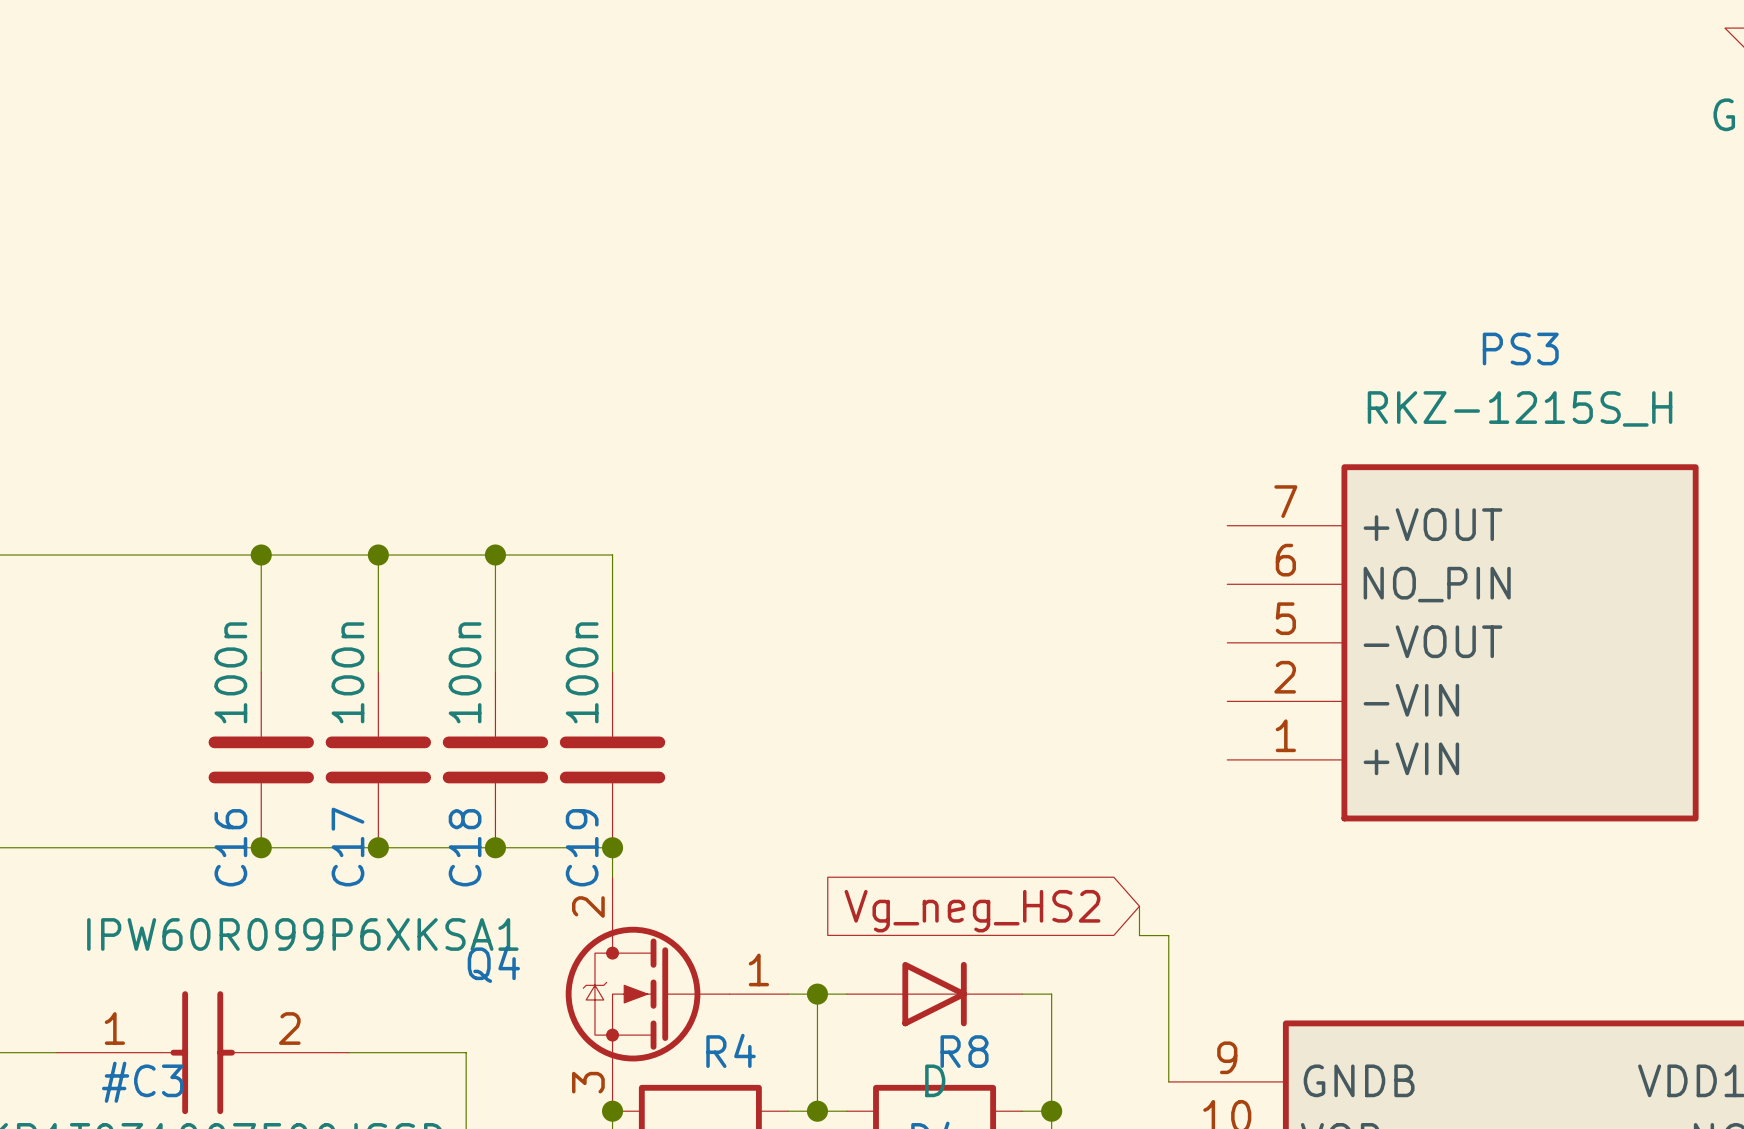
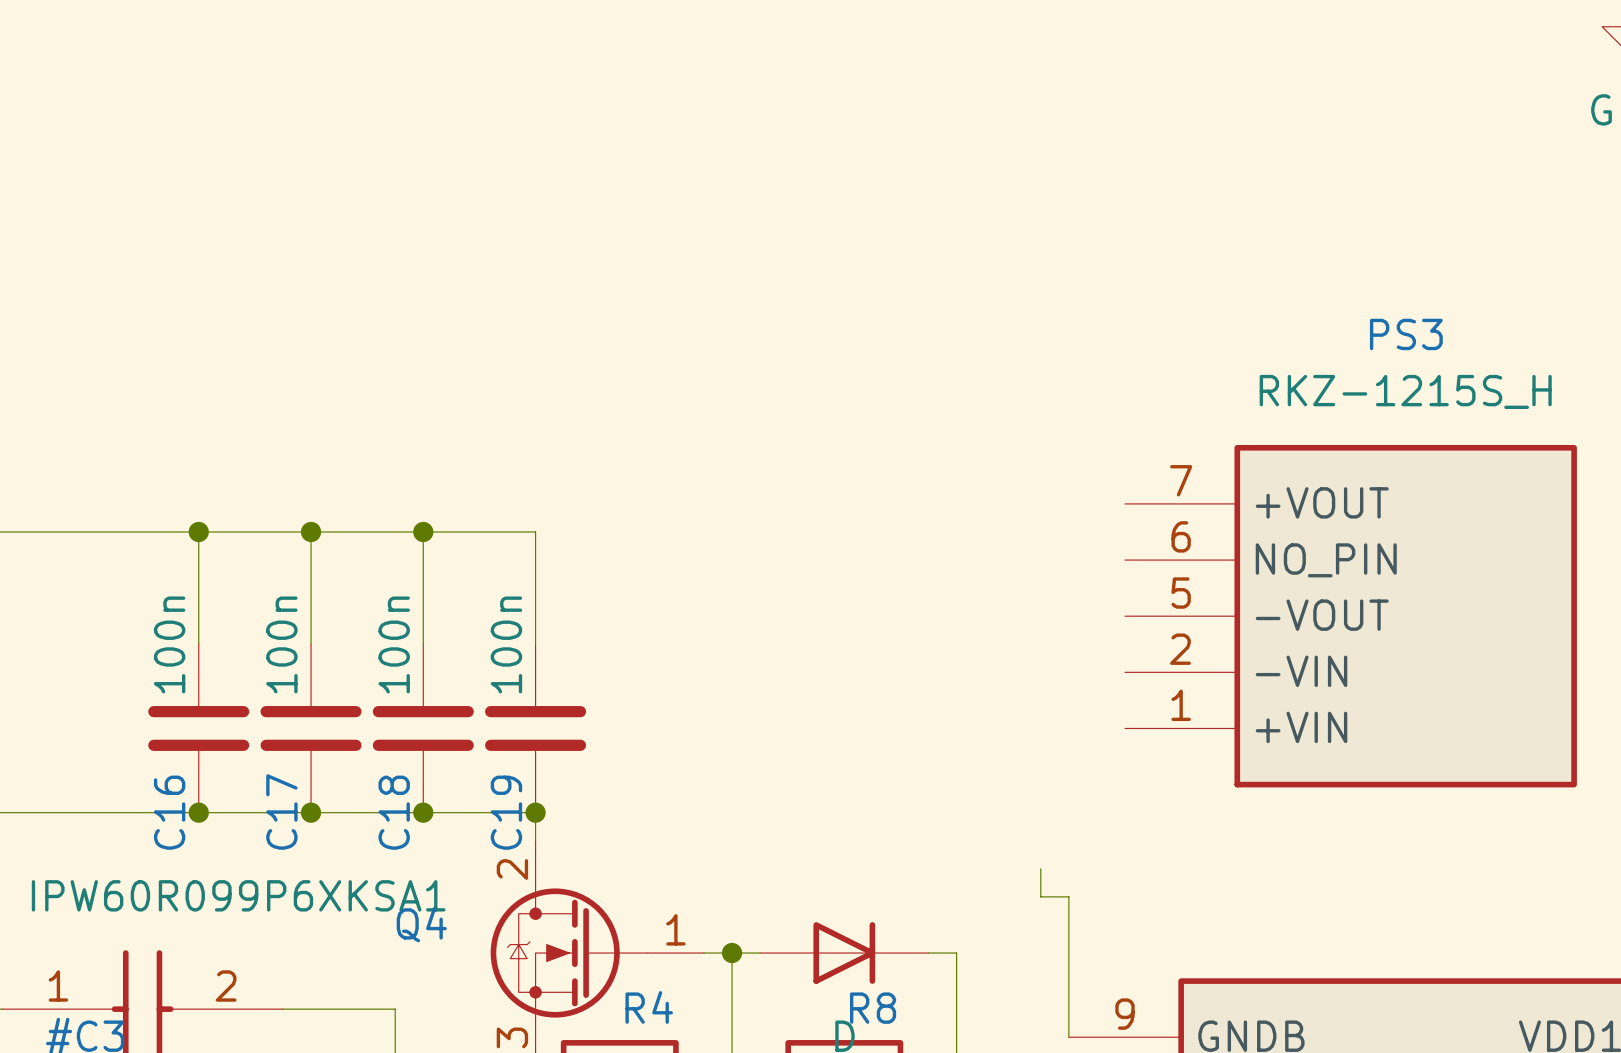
global label: Vg_neg_HS2 (972, 911) -> none

